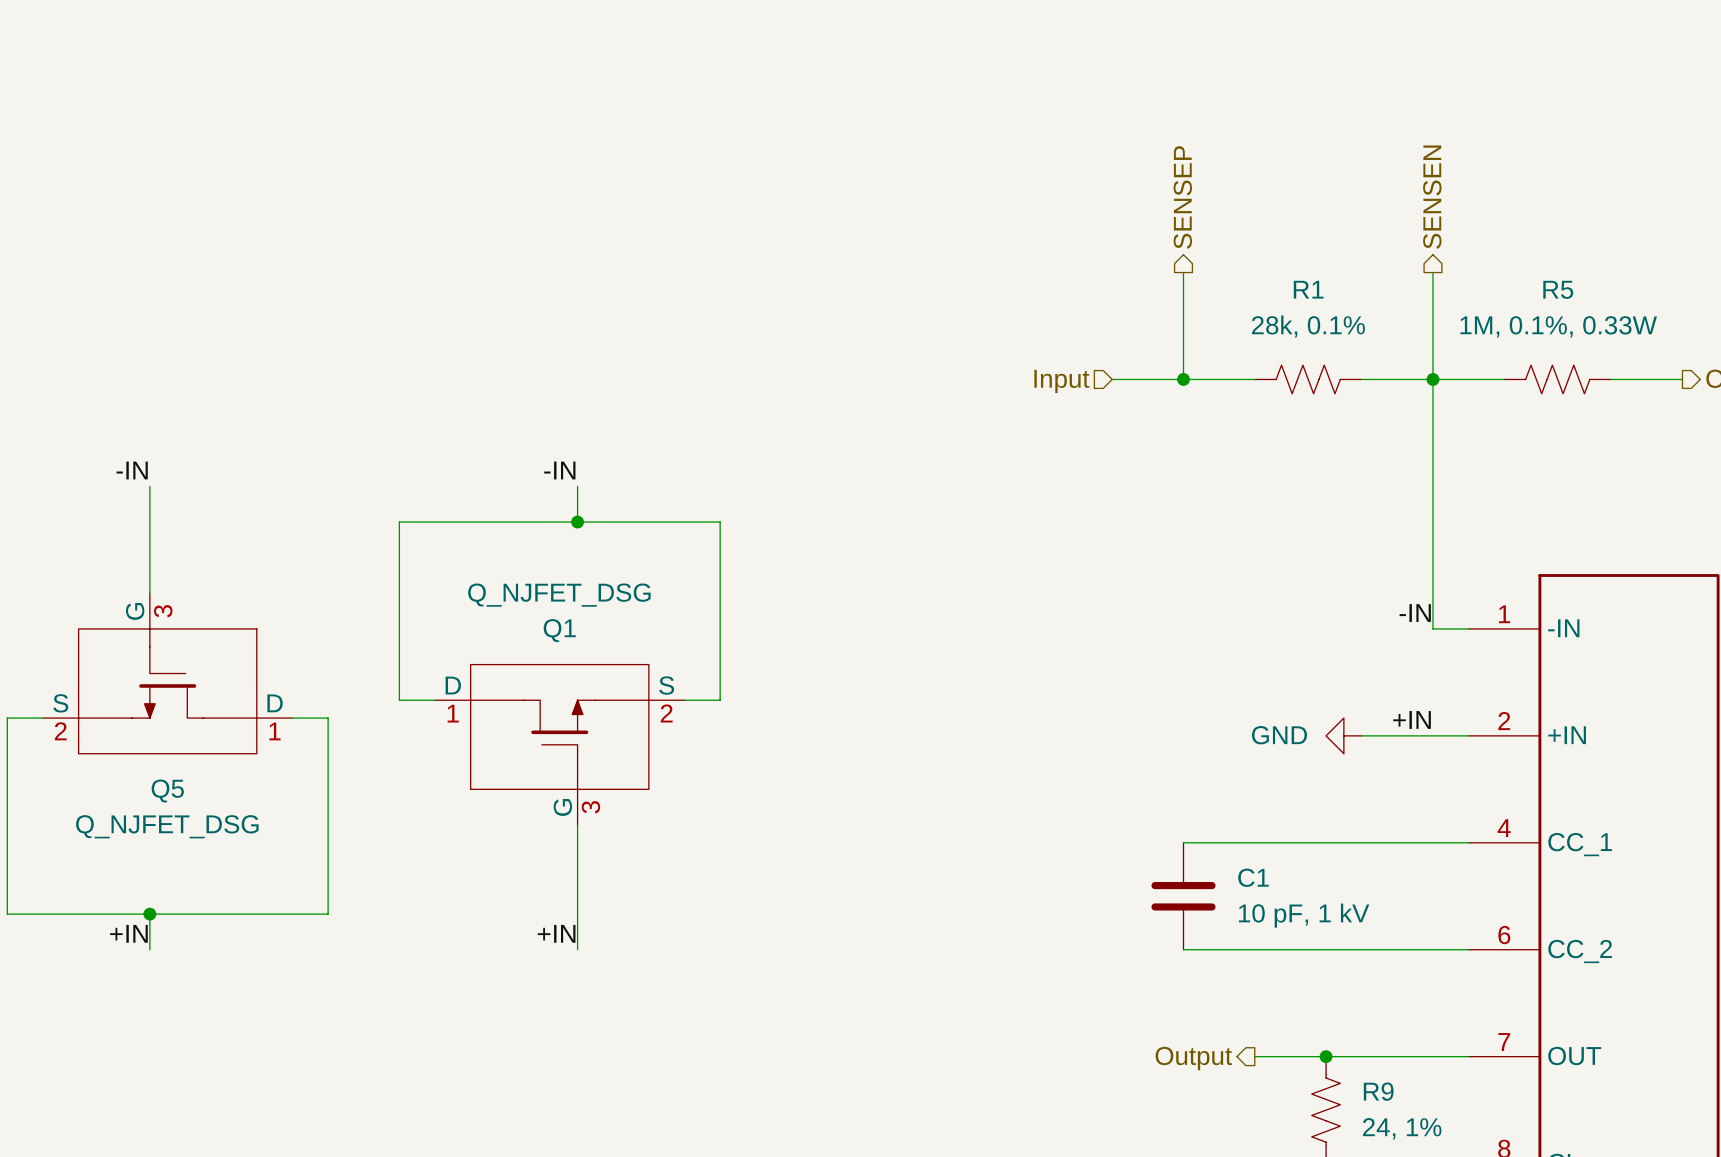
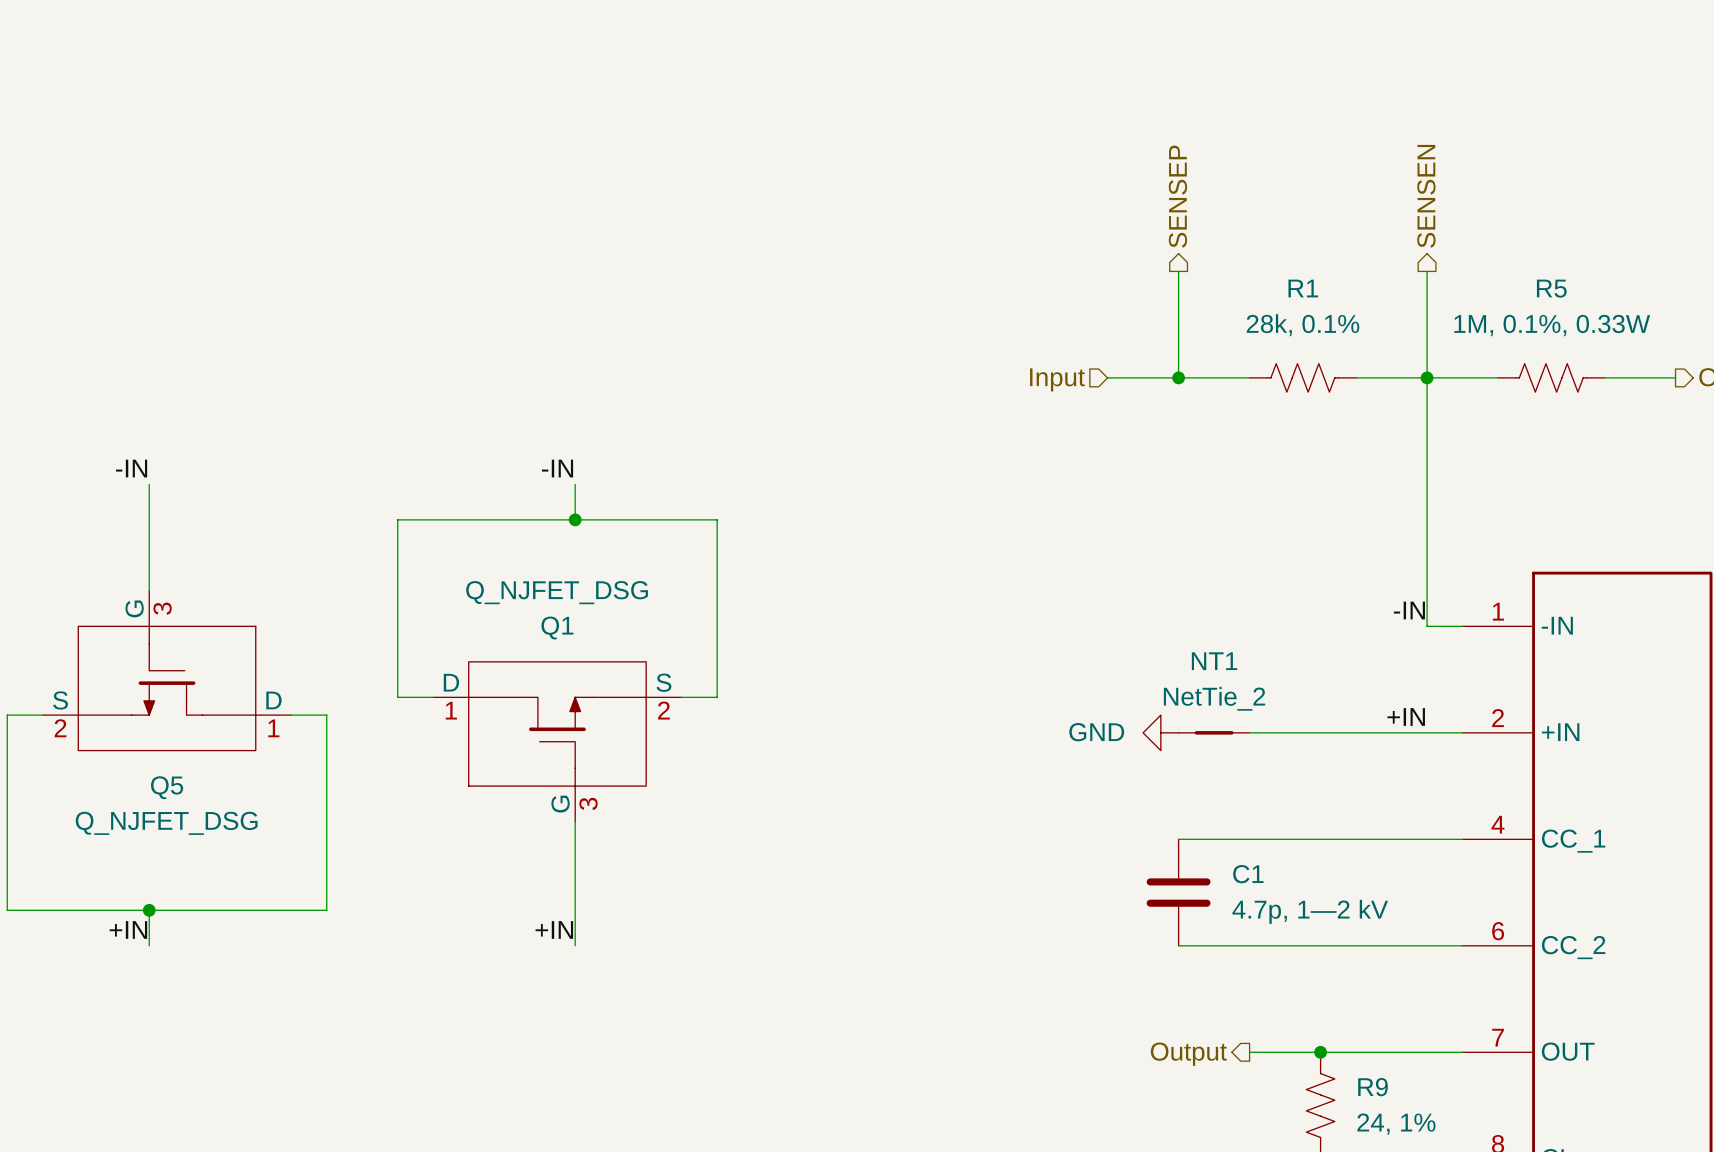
NT1: none -> NetTie_2 (1214, 732)
wire: none -> (1249, 732) (1356, 732)
power symbol position: GND (1343, 735) -> GND (1160, 732)
C1 value: 10 pF, 1 kV (1304, 915) -> 4.7p, 1—2 kV (1310, 911)

